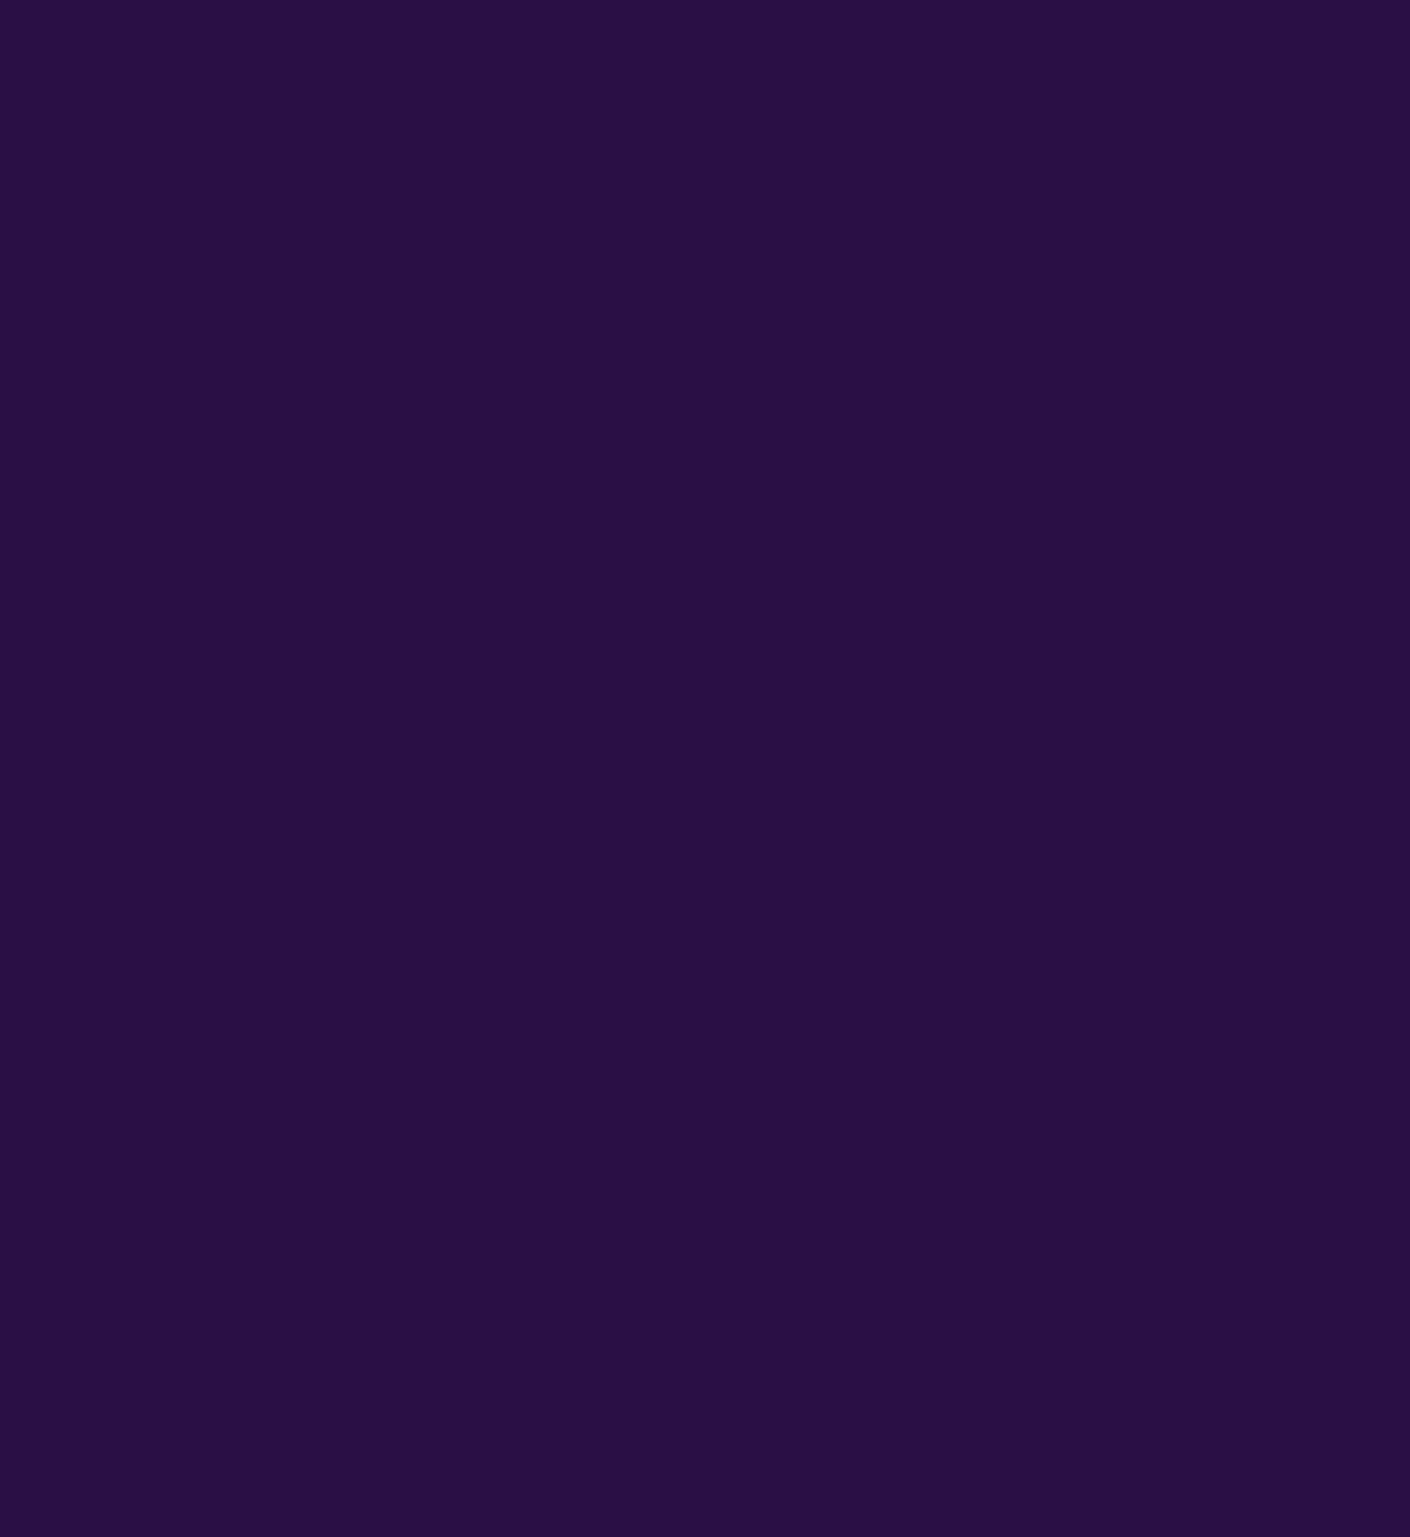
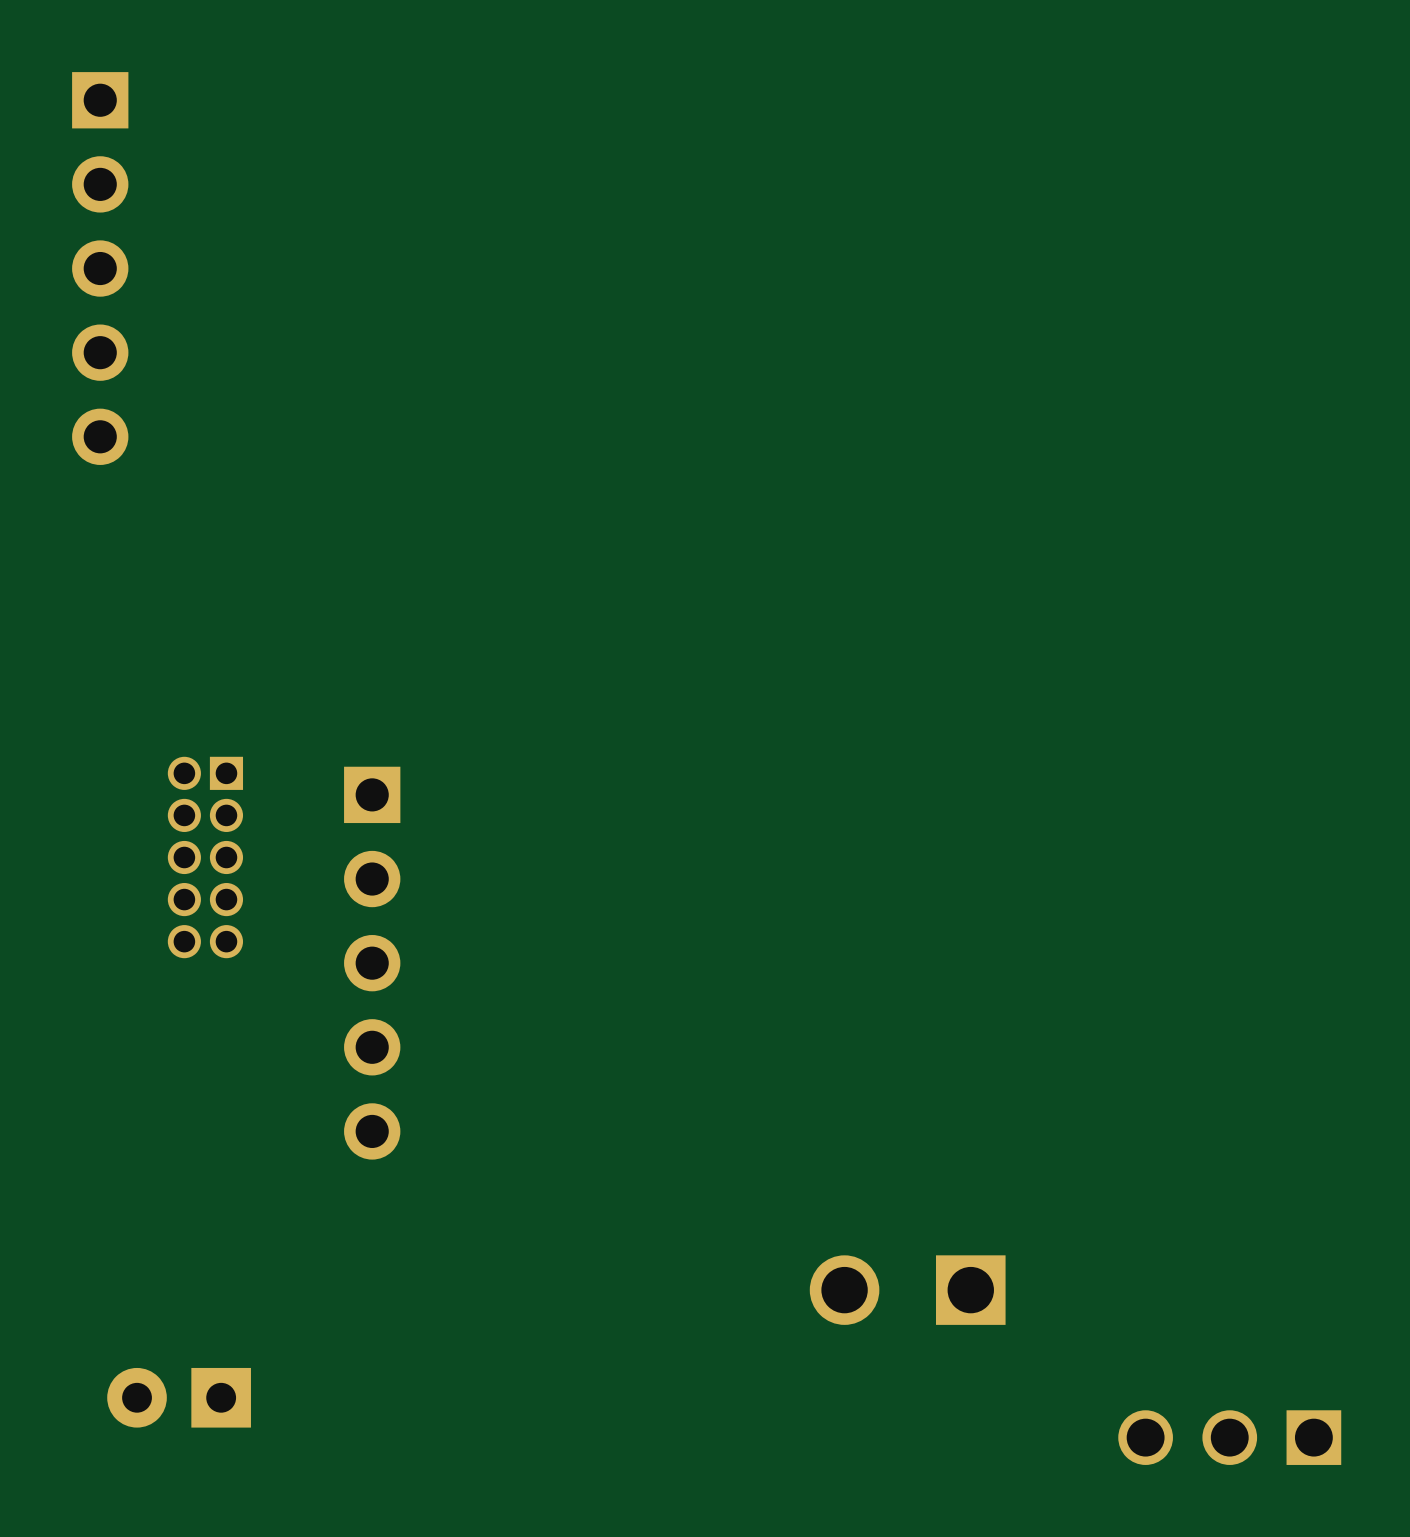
part: none -> (100, 268)
part: none -> (205, 857)
part: none -> (372, 963)
part: none -> (907, 1290)
part: none -> (179, 1397)
part: none -> (1229, 1437)

